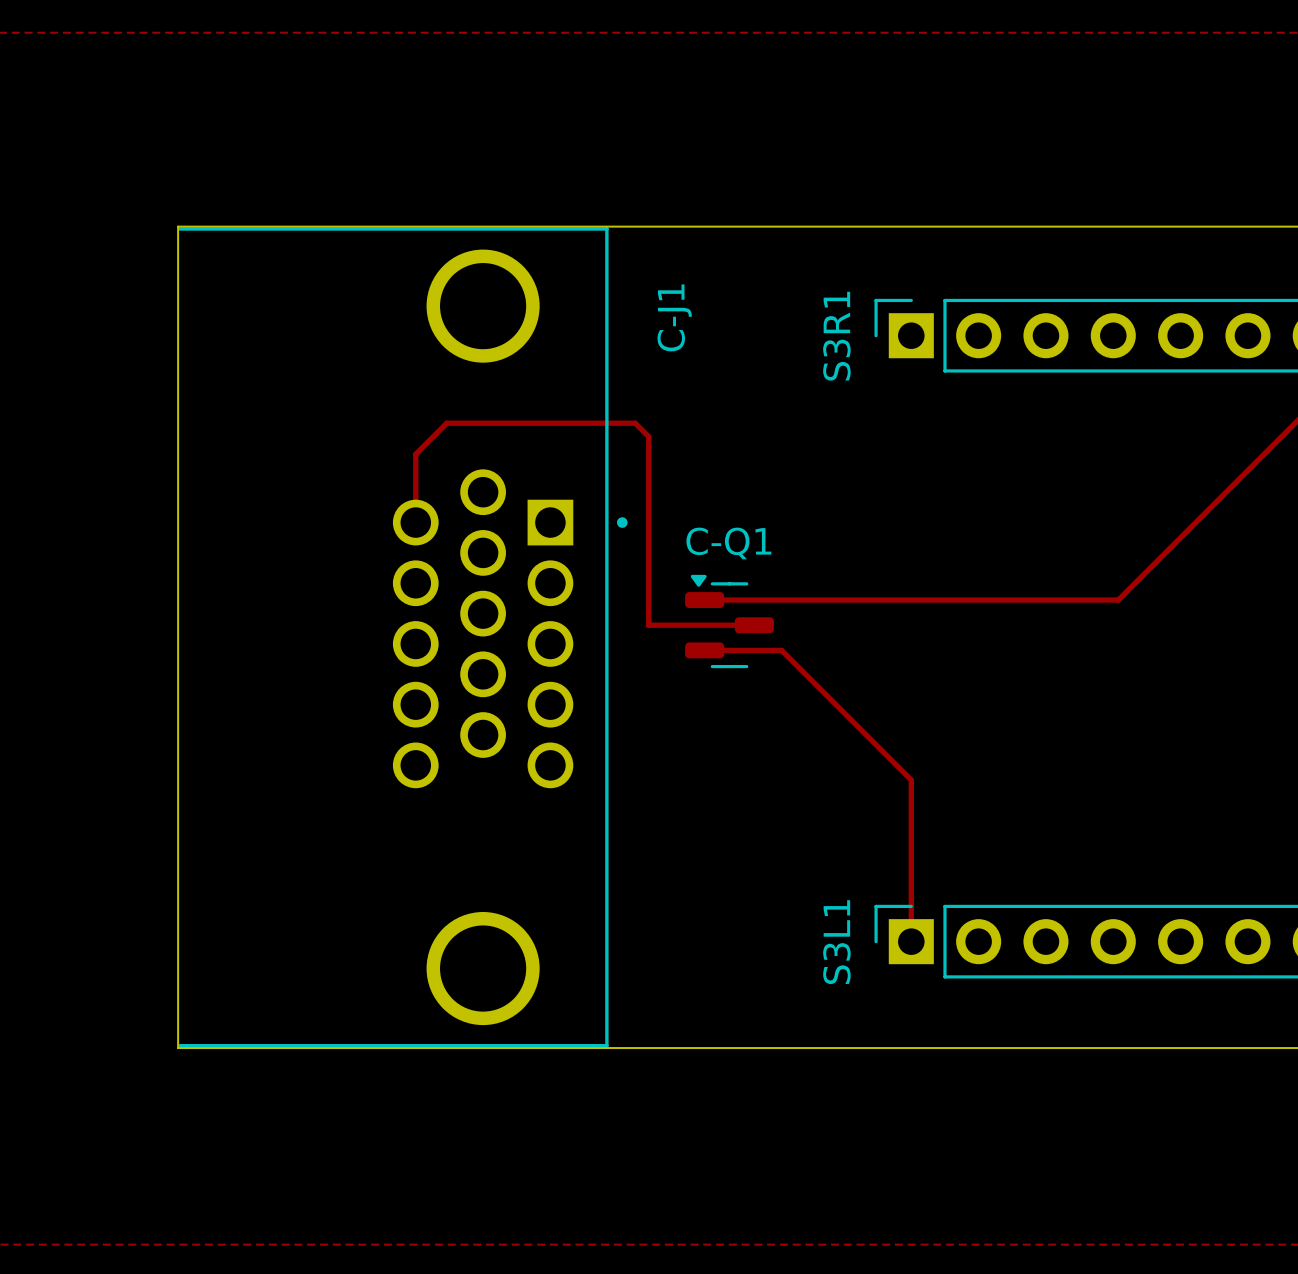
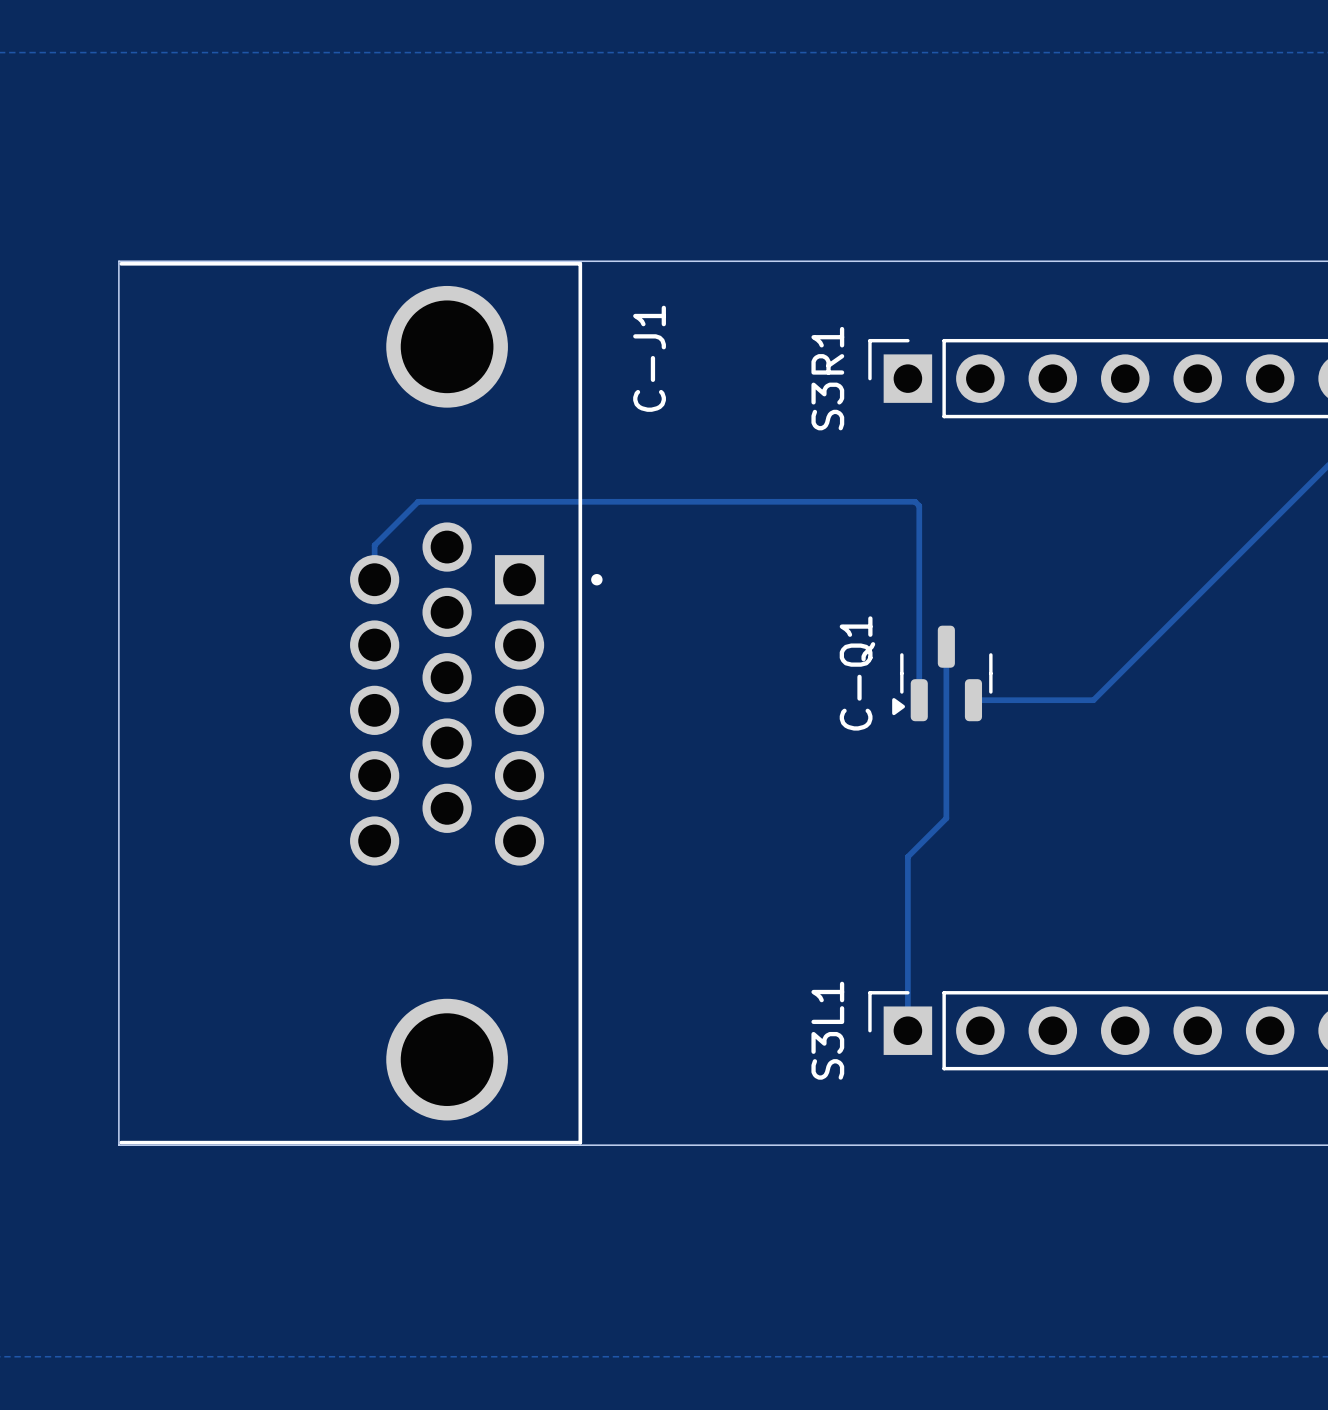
track: (415, 490) (415, 454) (446, 423) (635, 423) (648, 436) (648, 625) (754, 625) -> (374, 545) (418, 501) (915, 501) (919, 505) (919, 700)
track: (704, 600) (1118, 600) -> (973, 700) (1093, 700) (1130, 663)
C-Q1 rotation: 0° (729, 621) -> 90° counterclockwise (942, 673)
C-Q1 position: (729, 621) -> (942, 673)
track: (704, 650) (781, 650) (911, 780) -> (946, 646) (946, 818) (907, 856)

